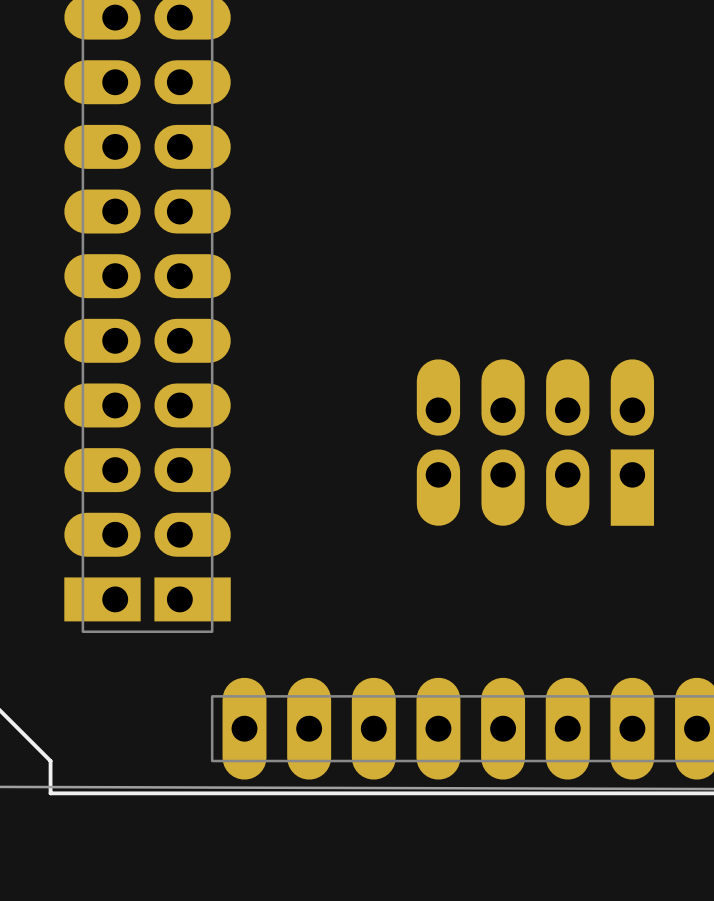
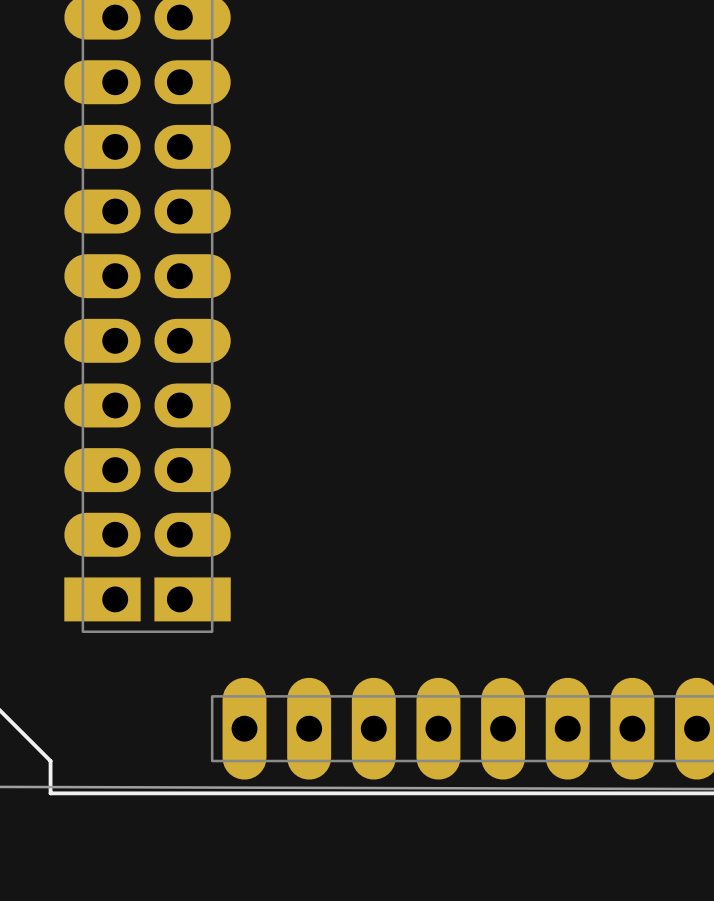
part: (535, 442) -> none

